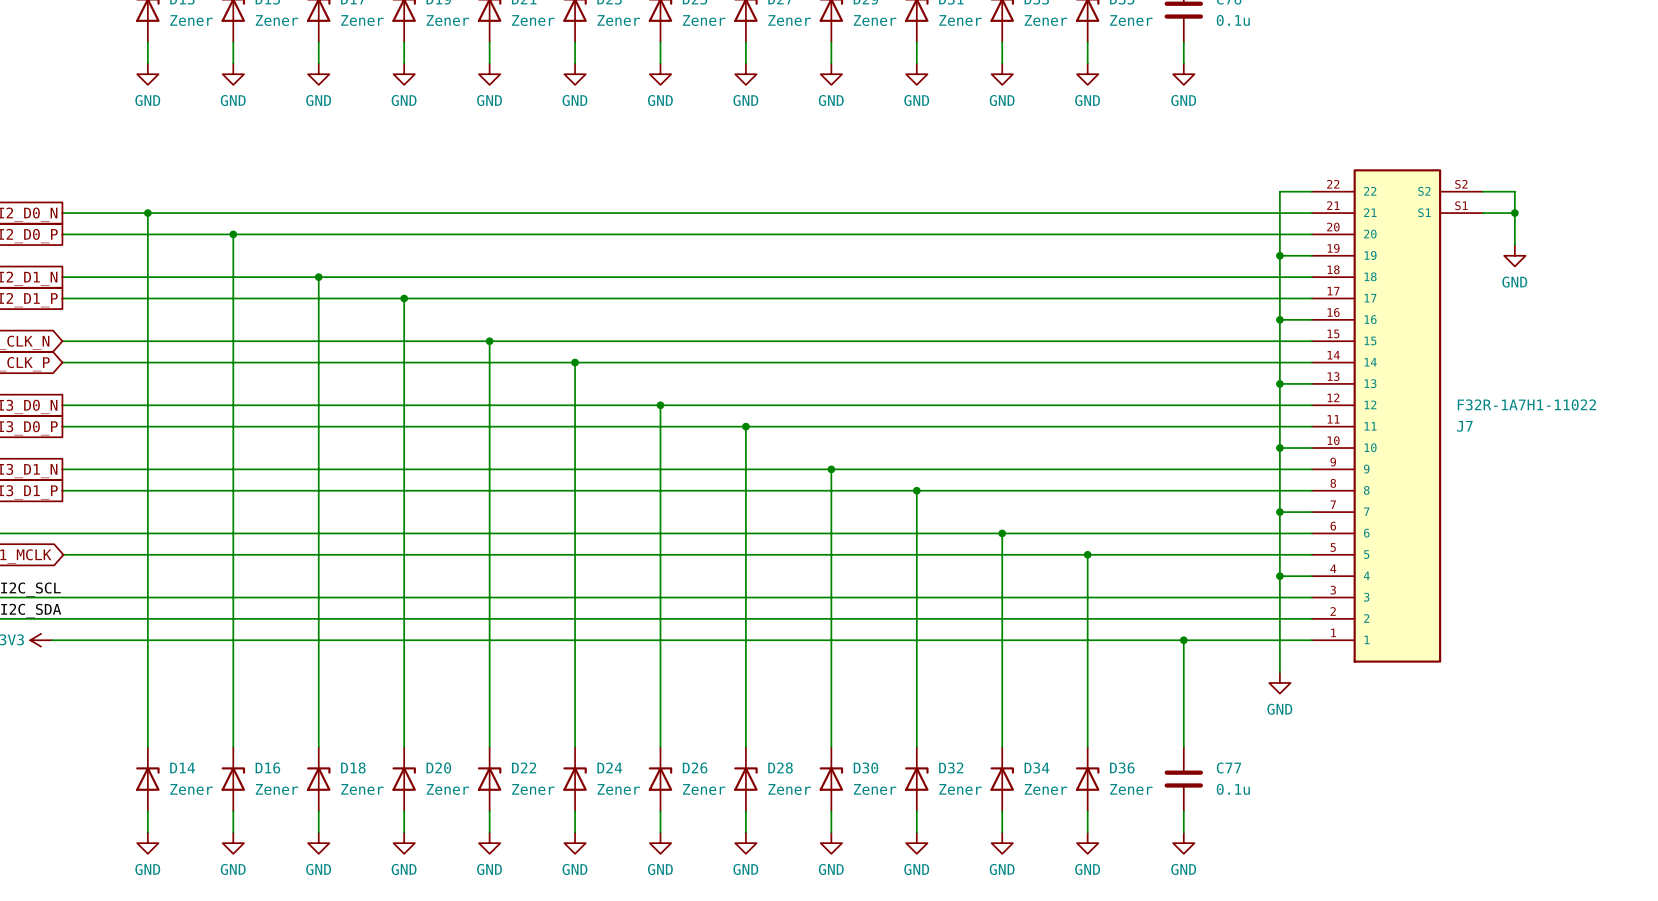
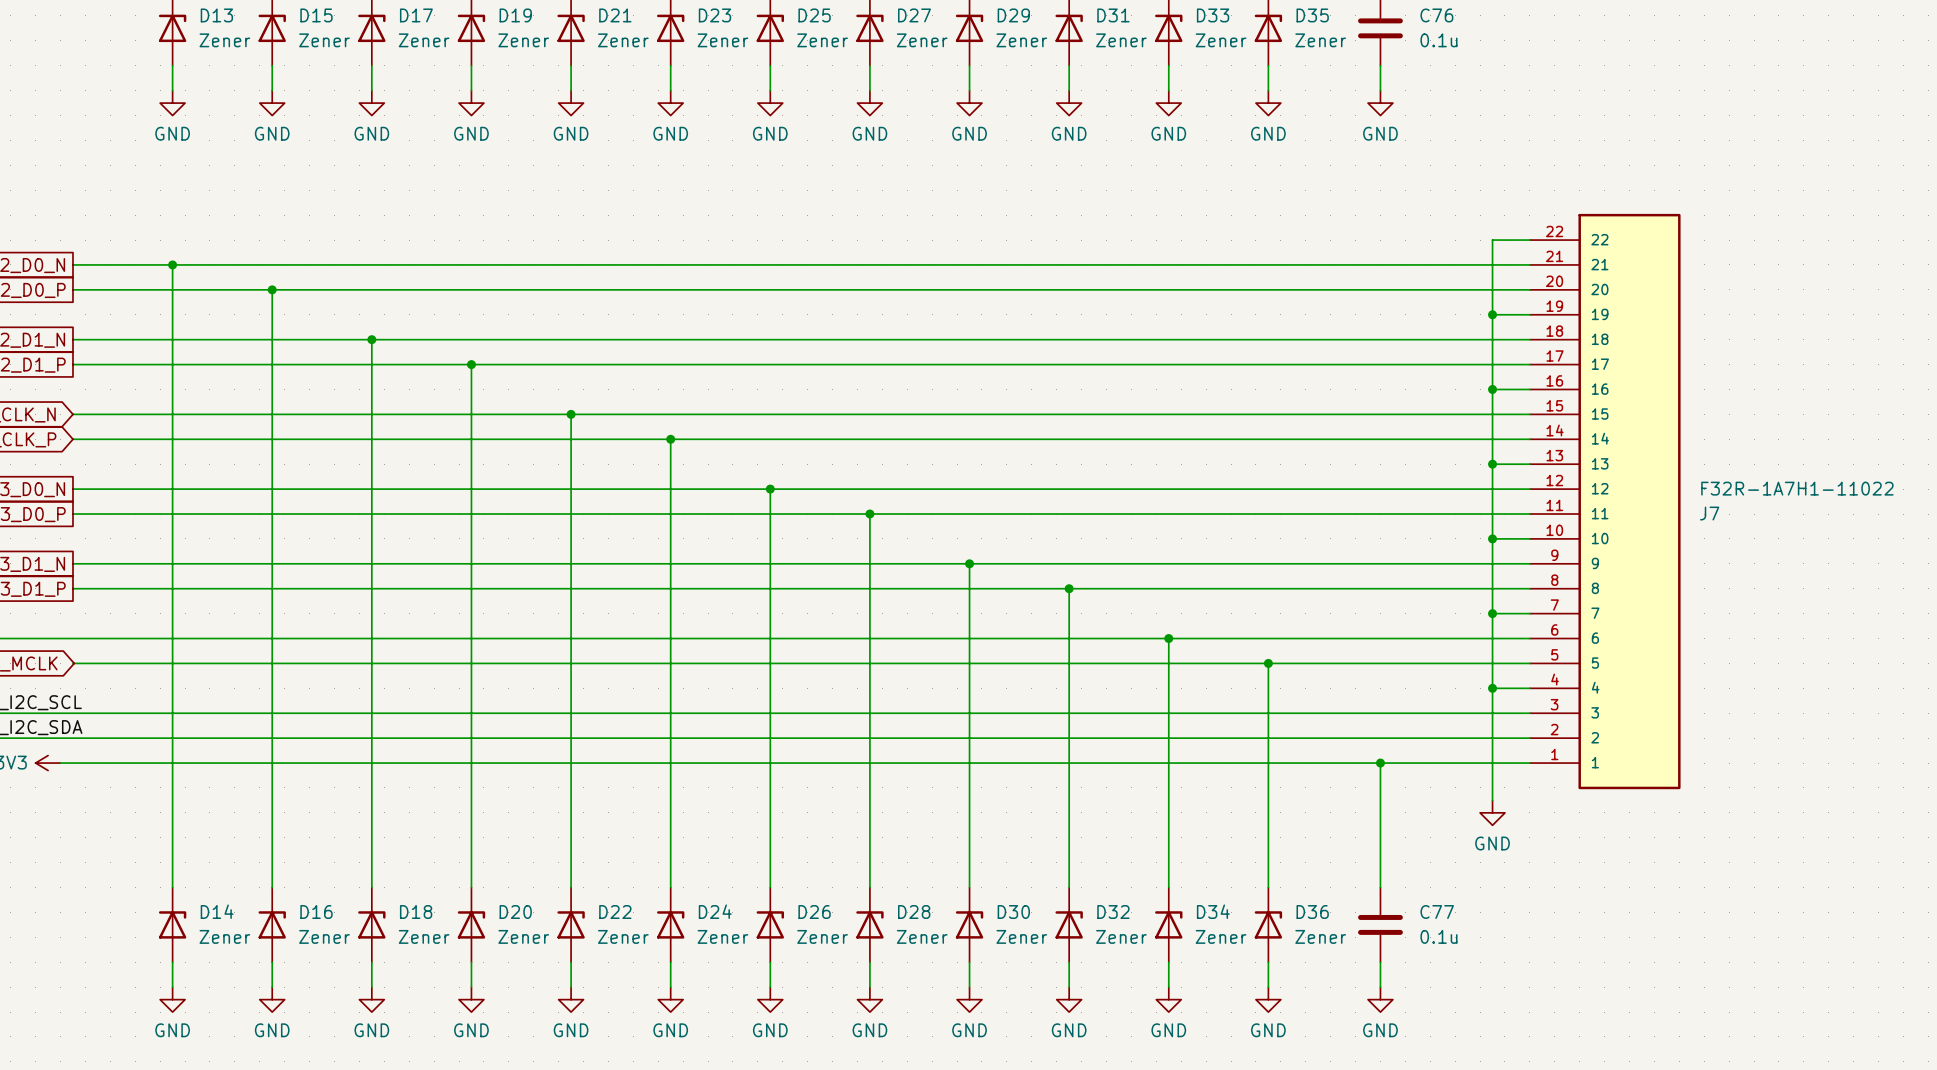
J7 symbol: [1311, 169, 1483, 663] -> [1529, 213, 1681, 790]
wire: (1482, 191) (1514, 191) (1514, 245) -> none
wire: (1482, 213) (1514, 213) -> none
junction: (1514, 213) -> none
power symbol: GND (1514, 255) -> none

